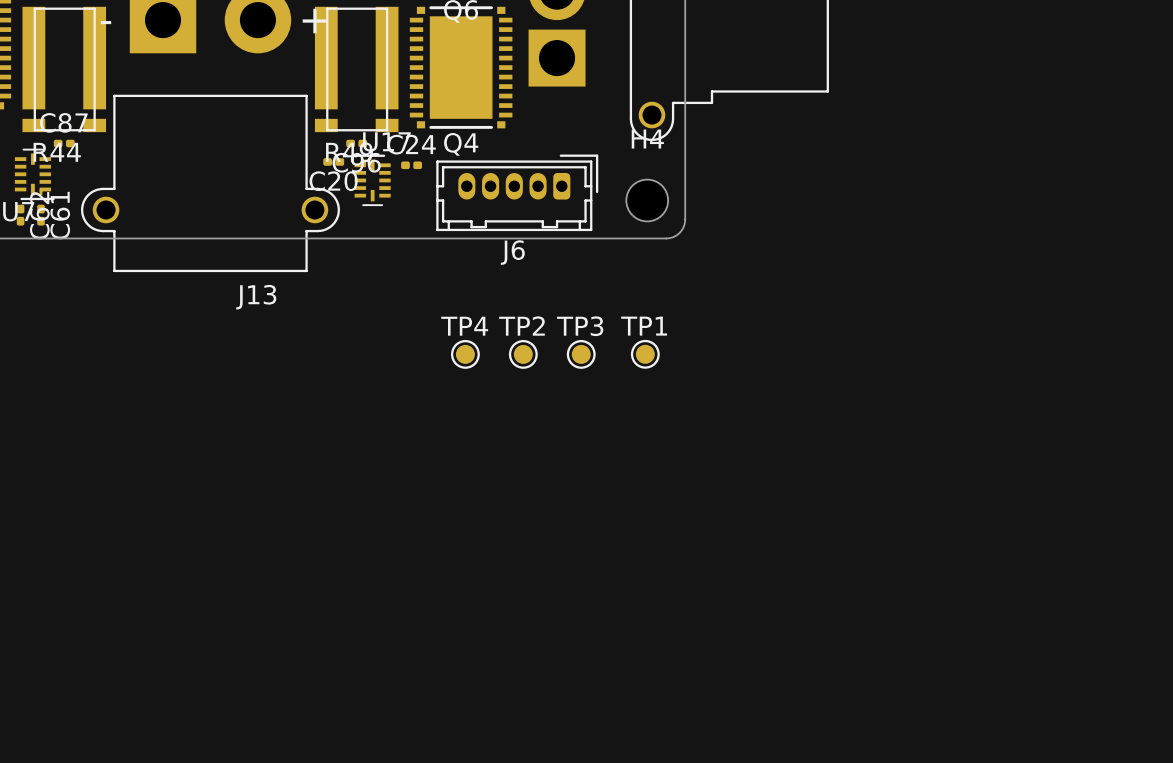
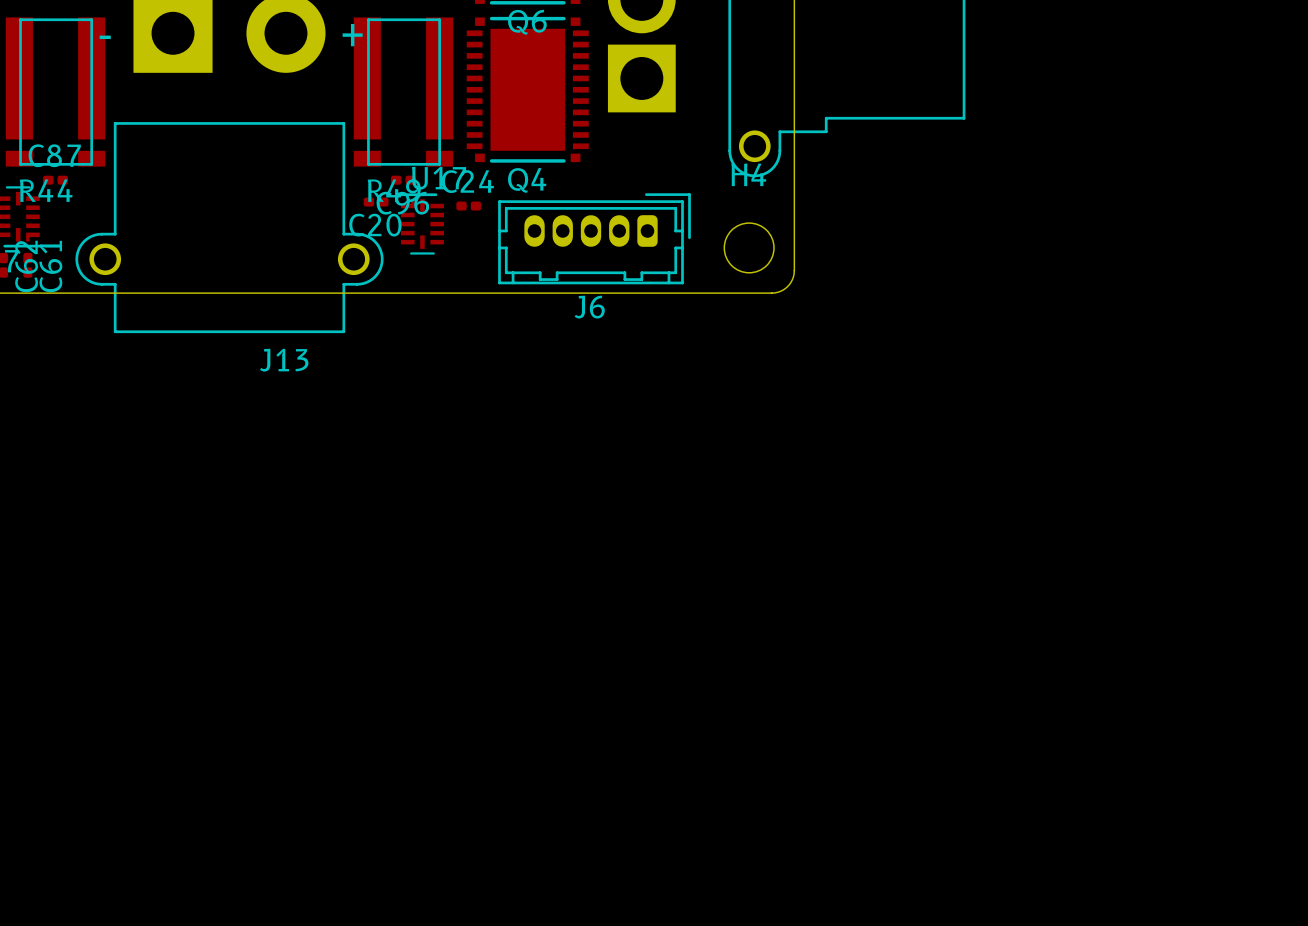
TP4: (465, 354) -> none
TP2: (523, 354) -> none
TP3: (581, 354) -> none
TP1: (645, 354) -> none

